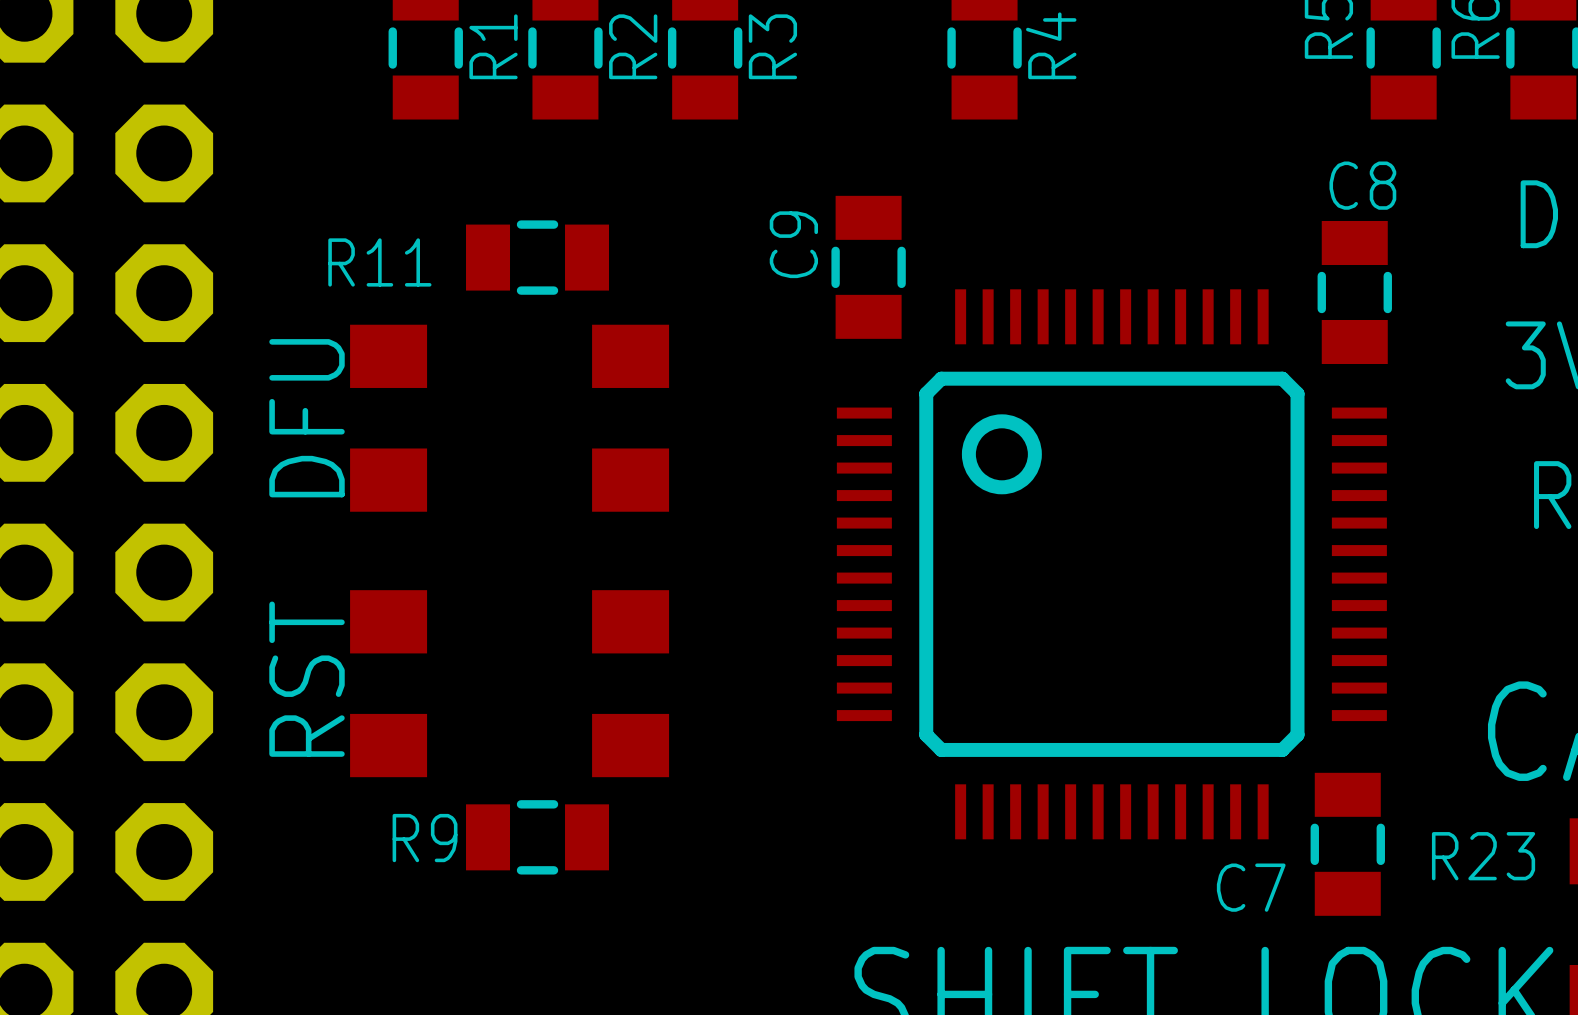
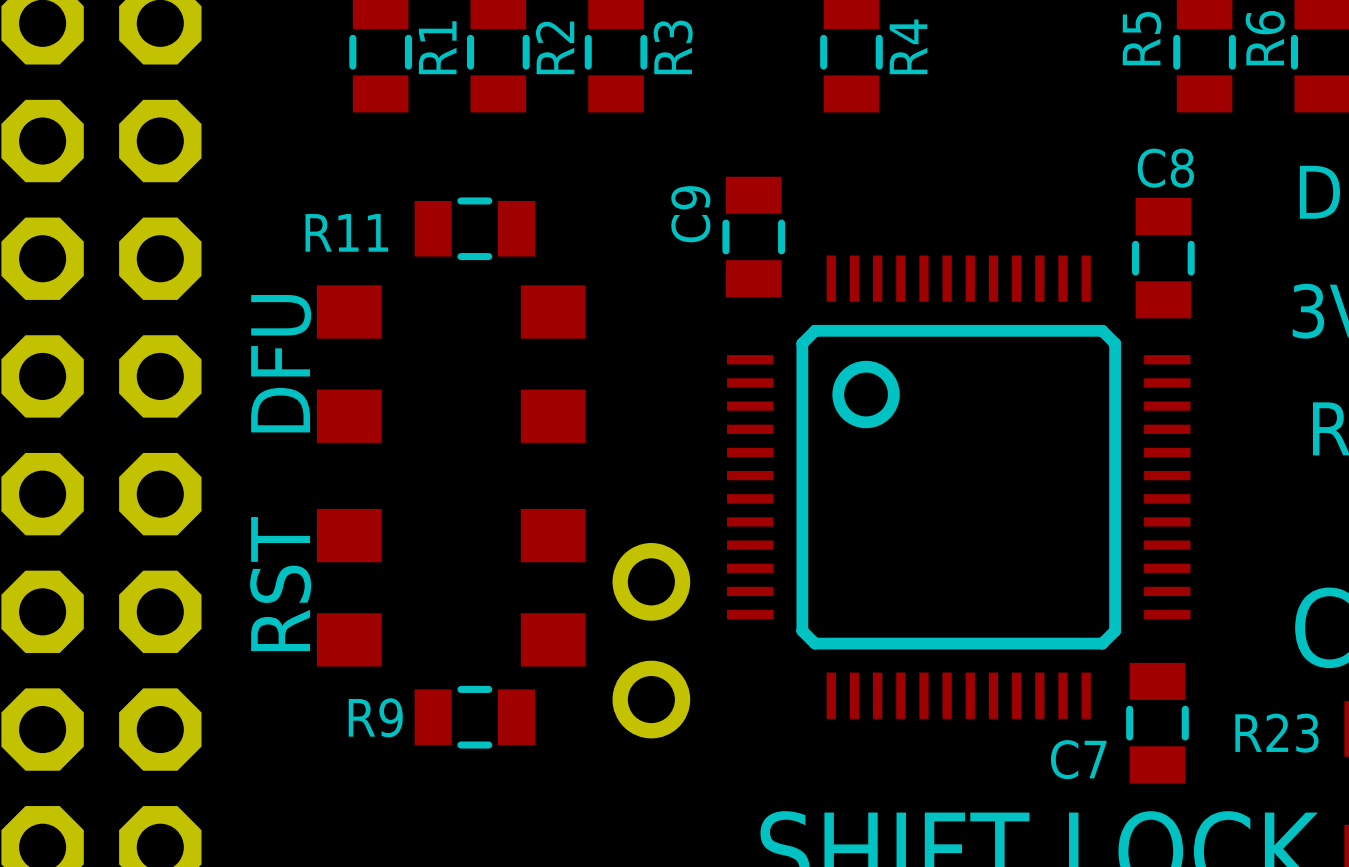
part: none -> (651, 640)

